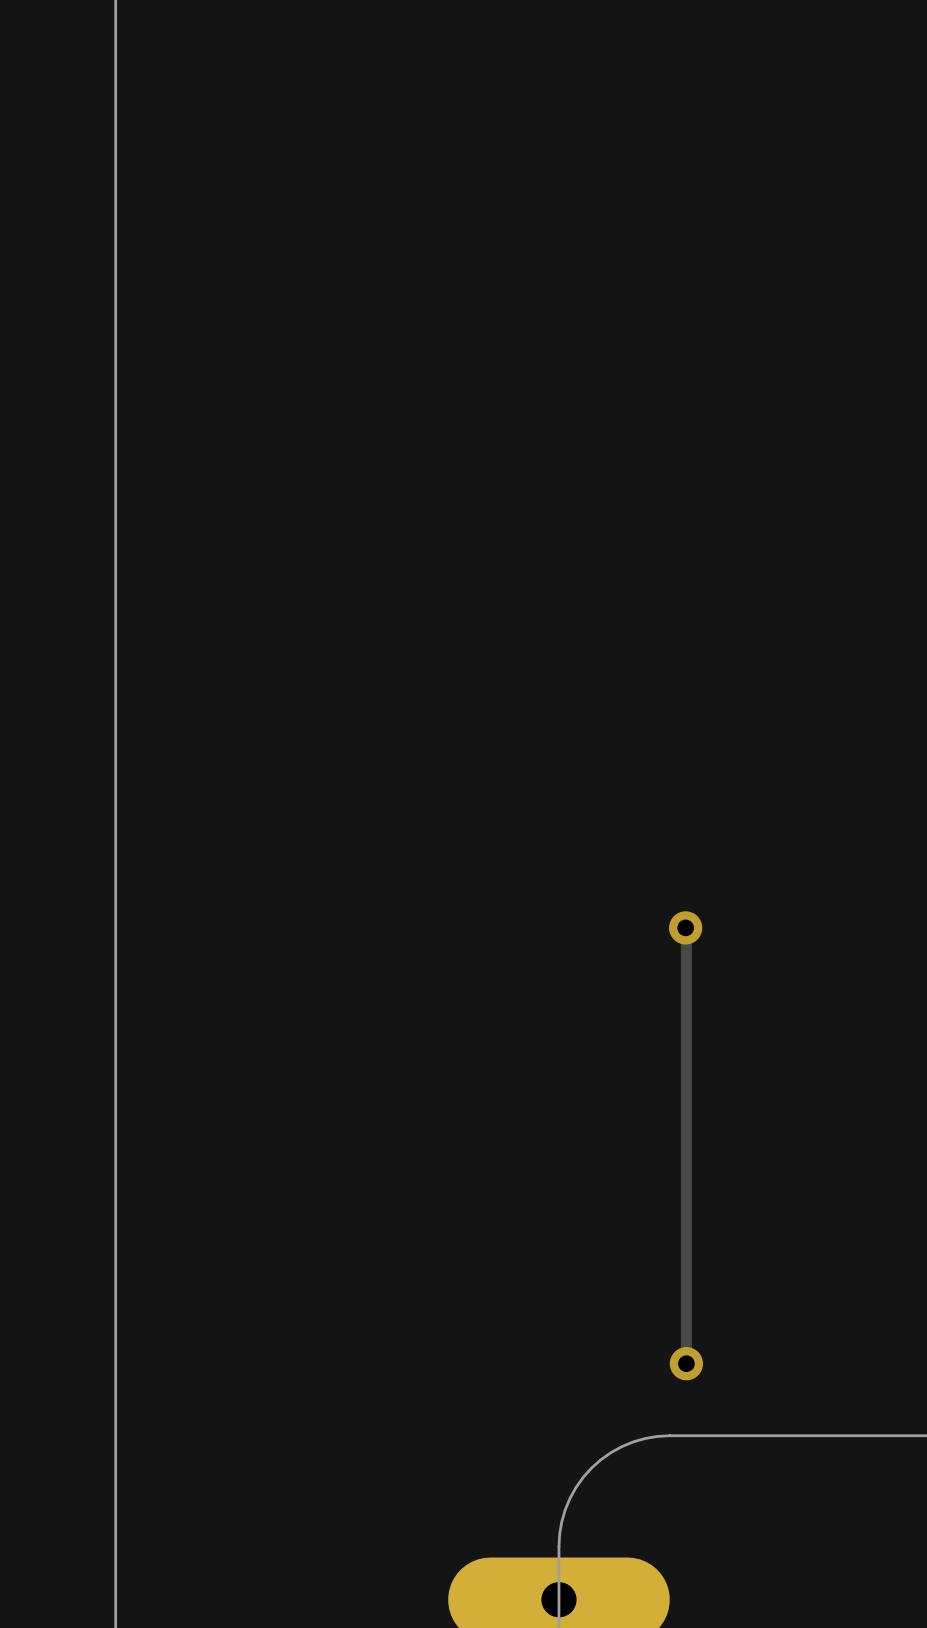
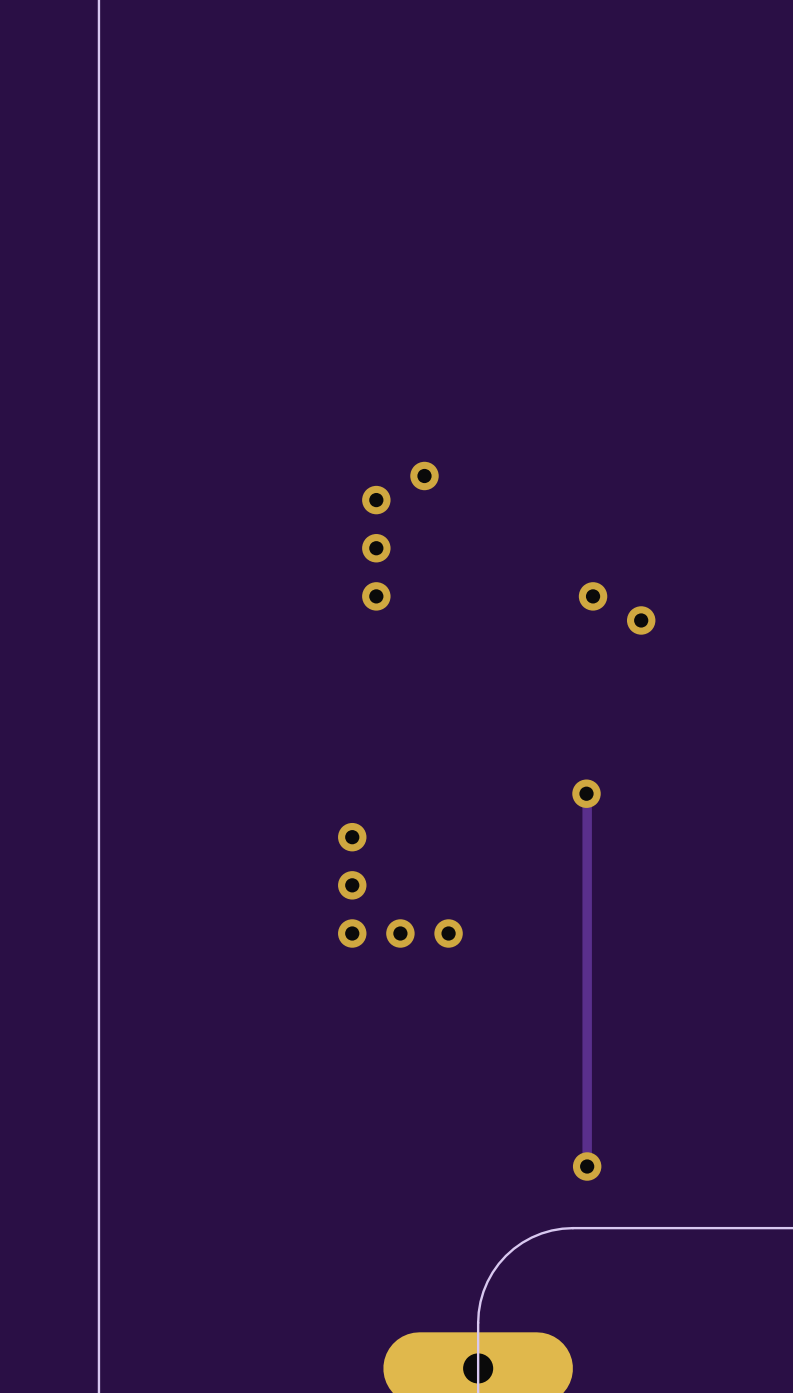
via: none -> (424, 475)
via: none -> (376, 500)
via: none -> (376, 548)
via: none -> (376, 596)
via: none -> (593, 596)
via: none -> (641, 620)
via: none -> (352, 837)
via: none -> (352, 885)
via: none -> (352, 933)
via: none -> (400, 933)
via: none -> (448, 933)

